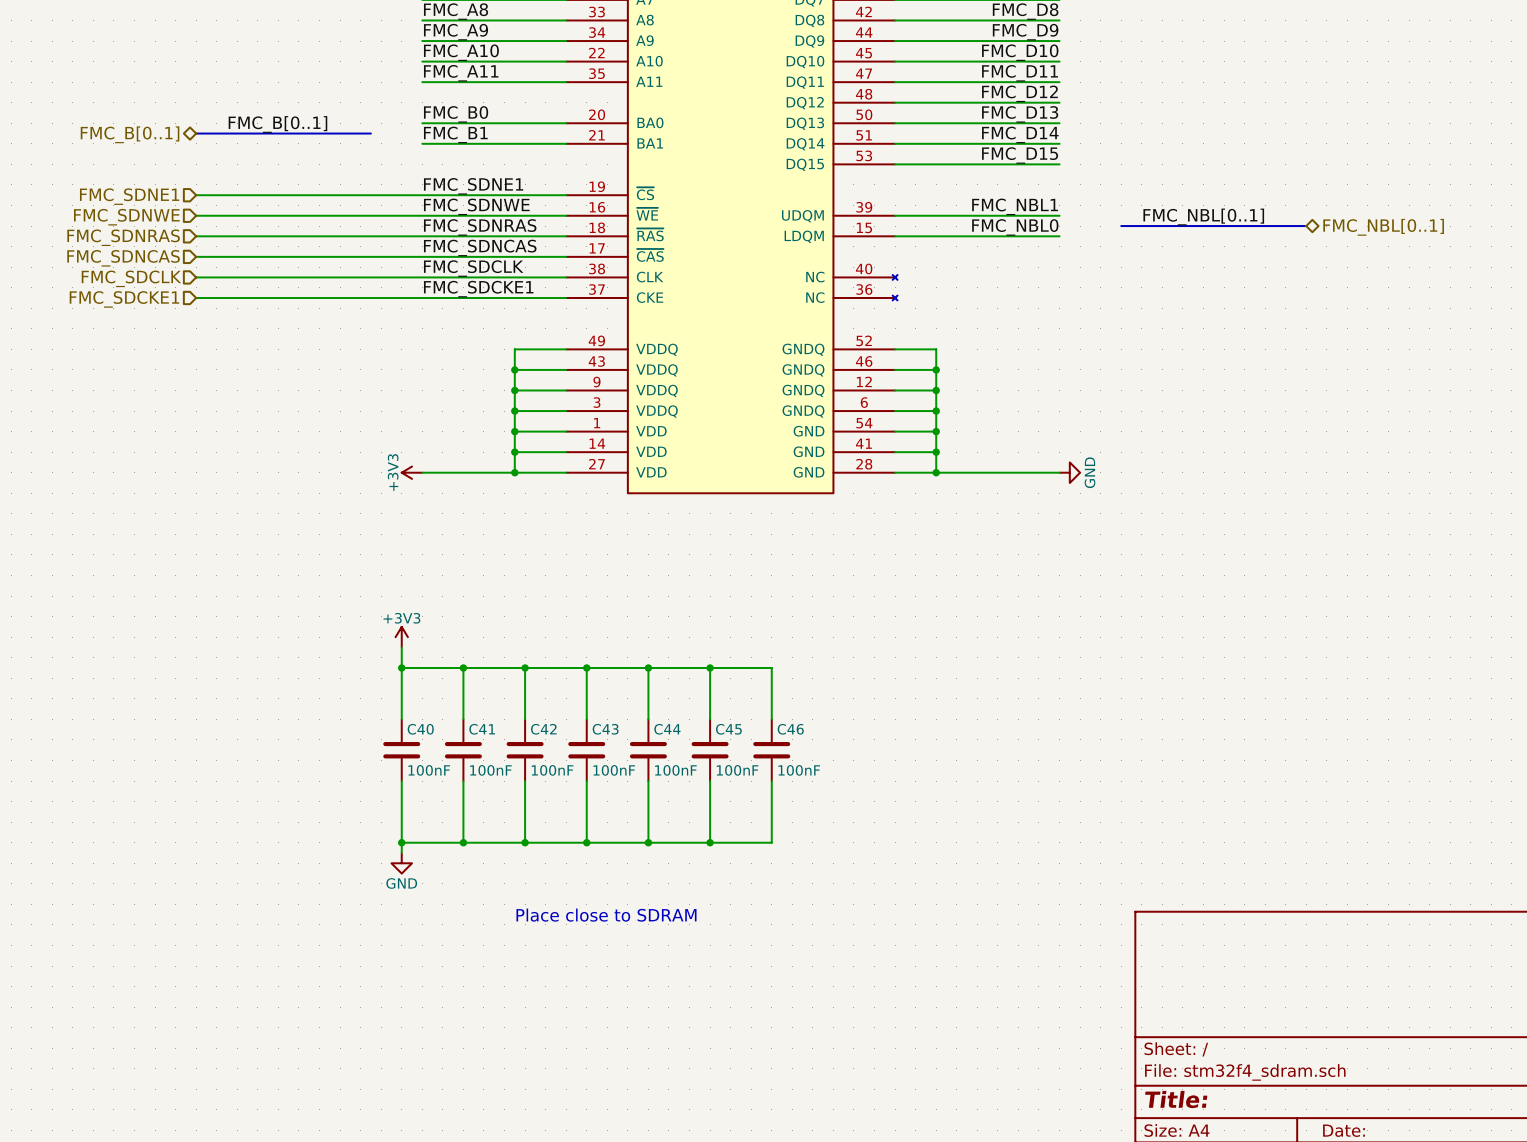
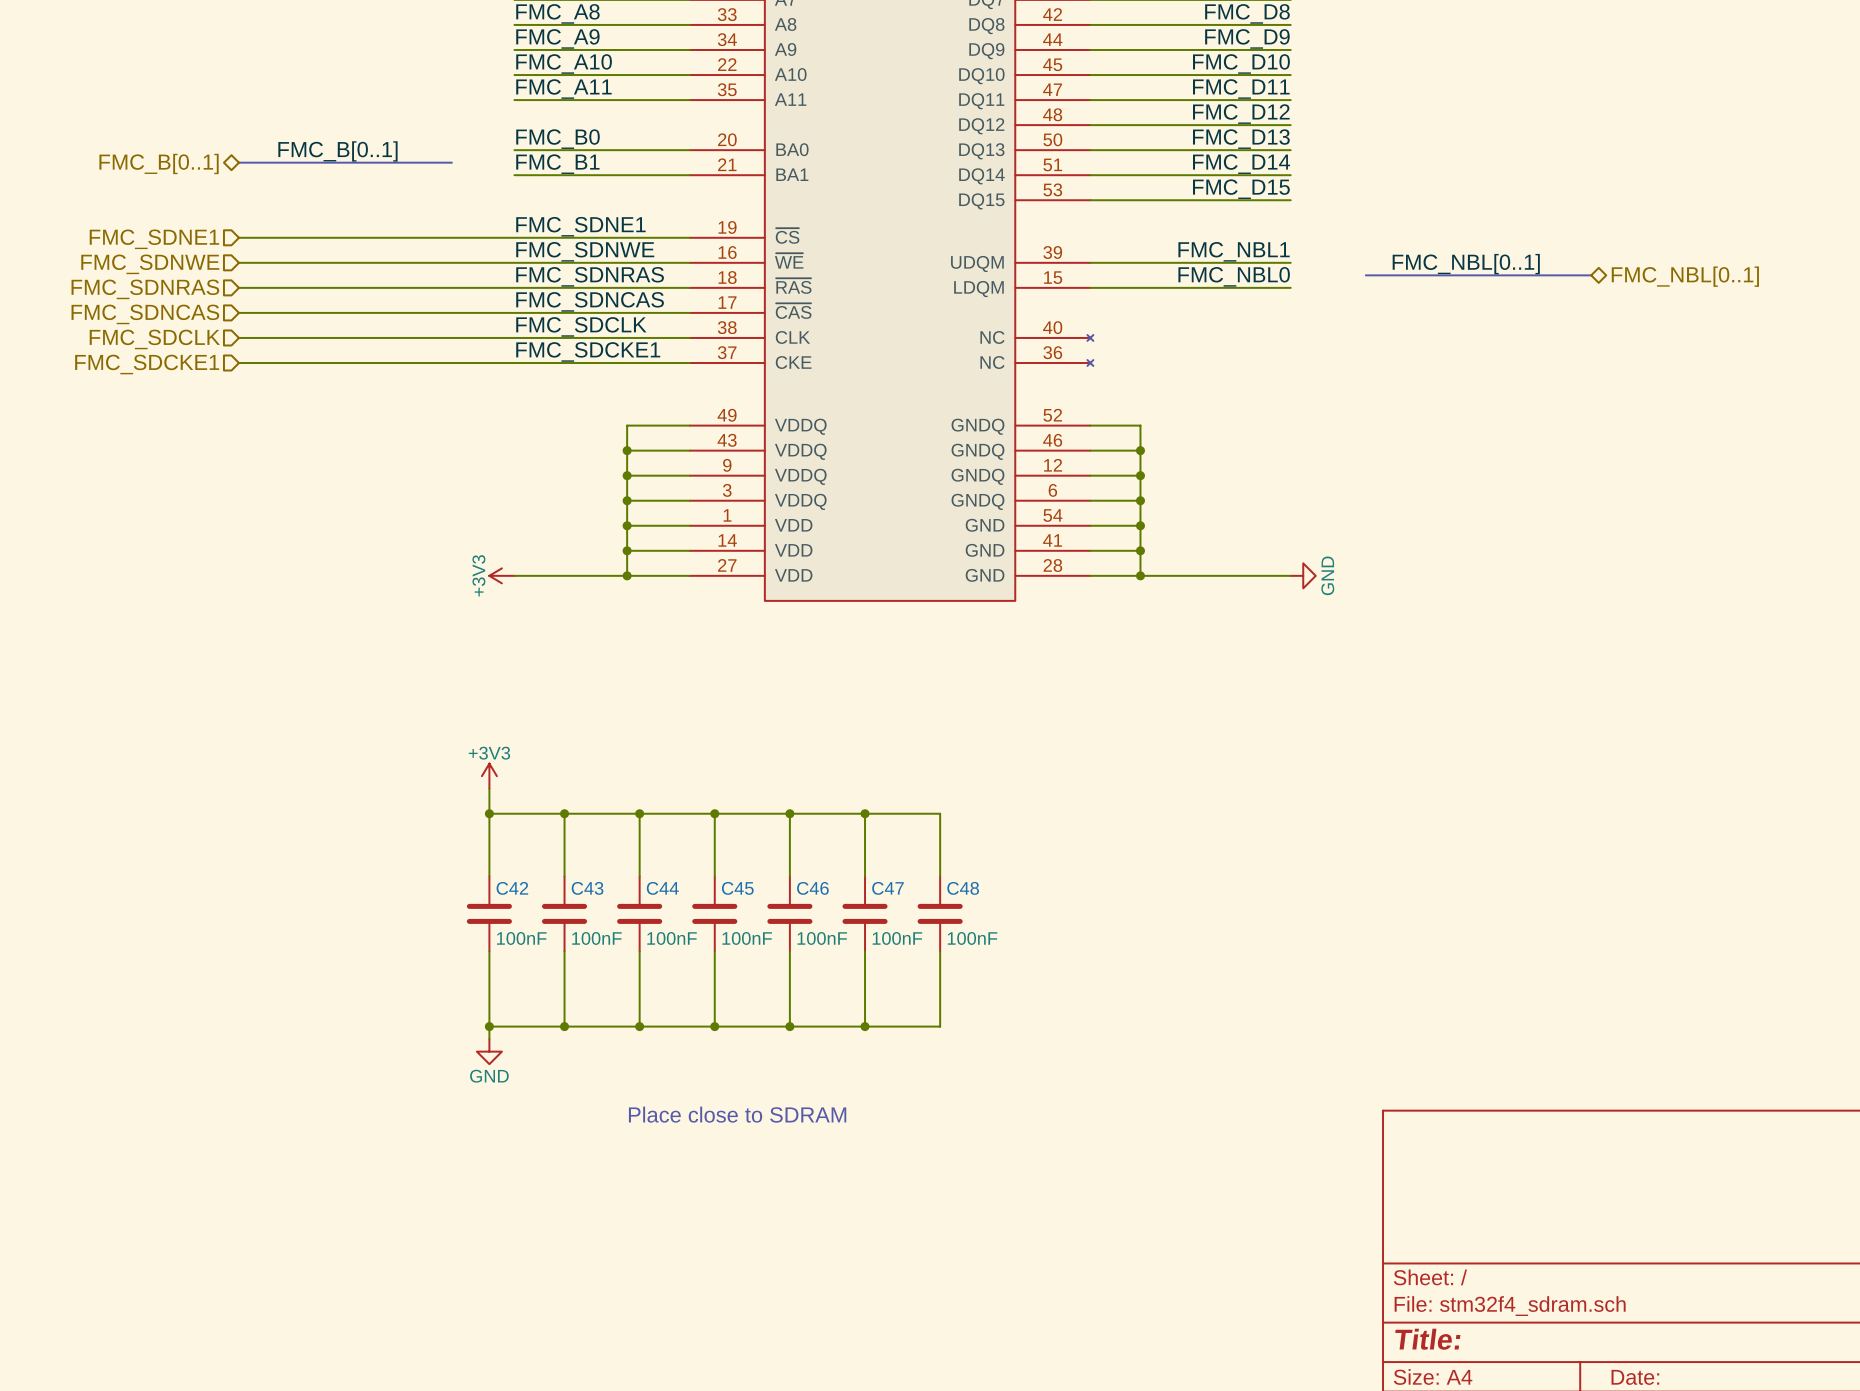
C40 name: C40 (420, 729) -> C42 (512, 888)
C41 name: C41 (482, 729) -> C43 (587, 888)
C42 name: C42 (543, 729) -> C44 (662, 888)
C43 name: C43 (605, 729) -> C45 (737, 888)
C44 name: C44 (667, 729) -> C46 (812, 888)
C45 name: C45 (728, 729) -> C47 (887, 888)
C46 name: C46 (790, 729) -> C48 (963, 888)

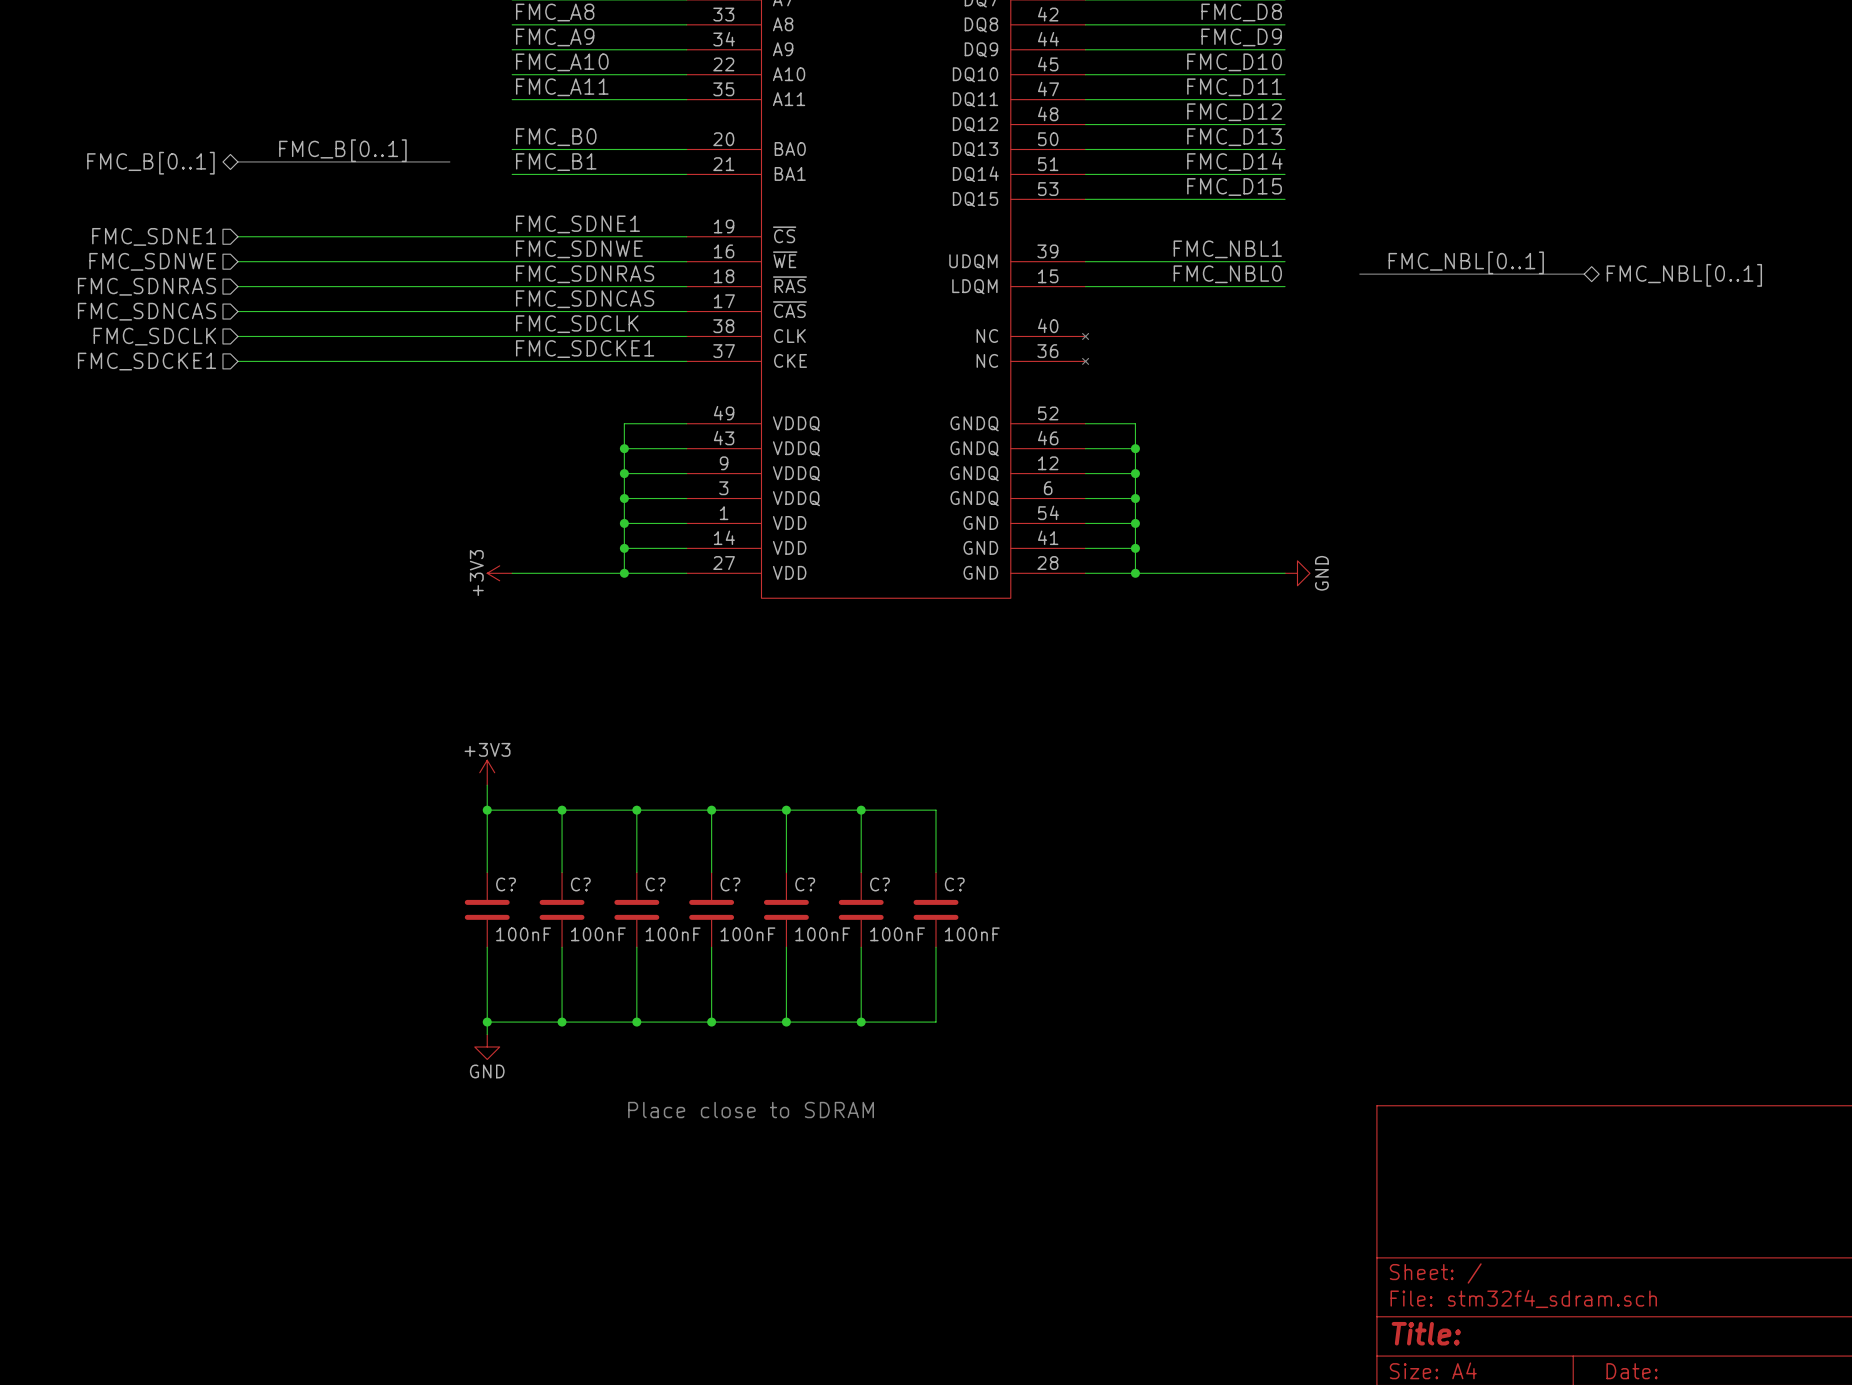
C42 name: C42 (512, 888) -> C? (506, 884)
C43 name: C43 (587, 888) -> C? (580, 884)
C44 name: C44 (662, 888) -> C? (655, 884)
C45 name: C45 (737, 888) -> C? (730, 884)
C46 name: C46 (812, 888) -> C? (805, 884)
C47 name: C47 (887, 888) -> C? (880, 884)
C48 name: C48 (963, 888) -> C? (954, 884)

